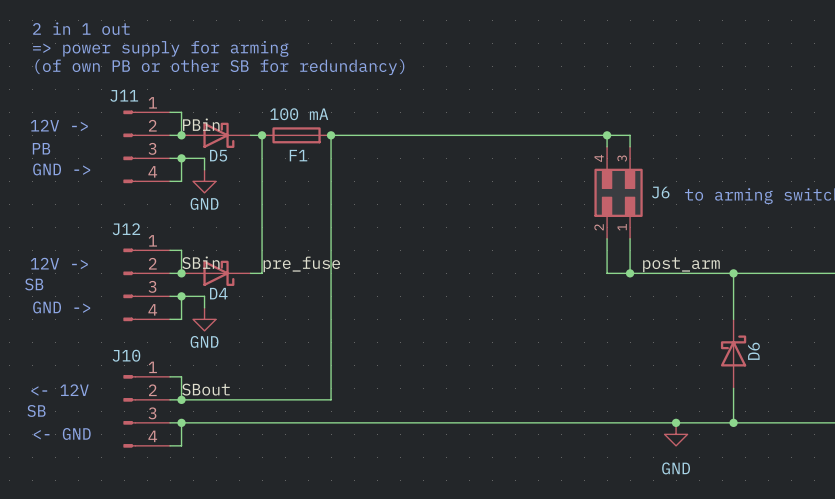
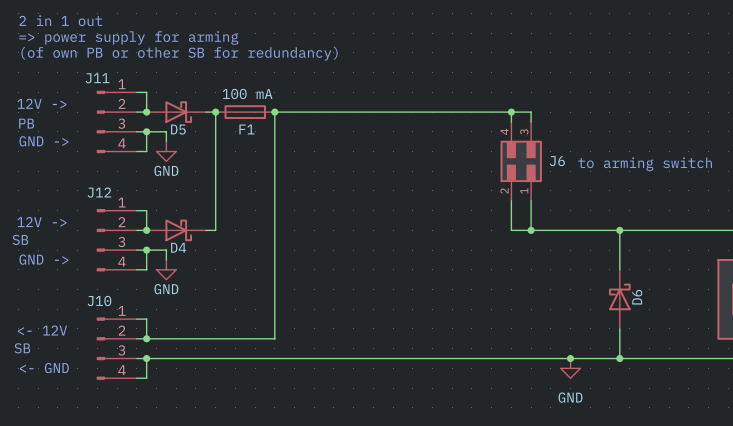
label: PBin (201, 124) -> none
label: SBin (200, 262) -> none
label: pre_fuse (301, 264) -> none
label: post_arm (681, 264) -> none
label: SBout (206, 389) -> none

